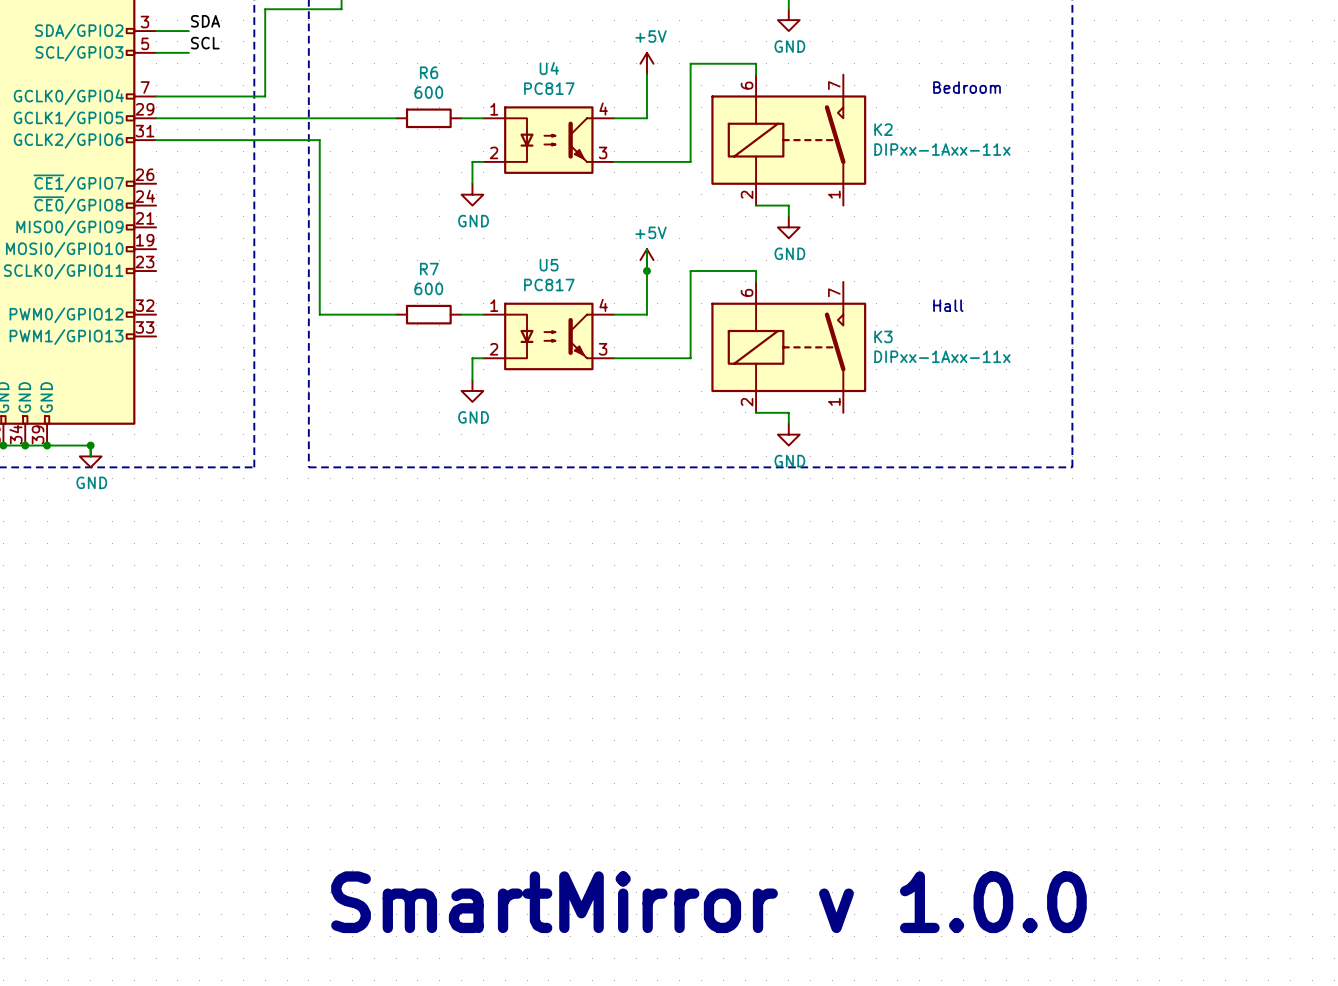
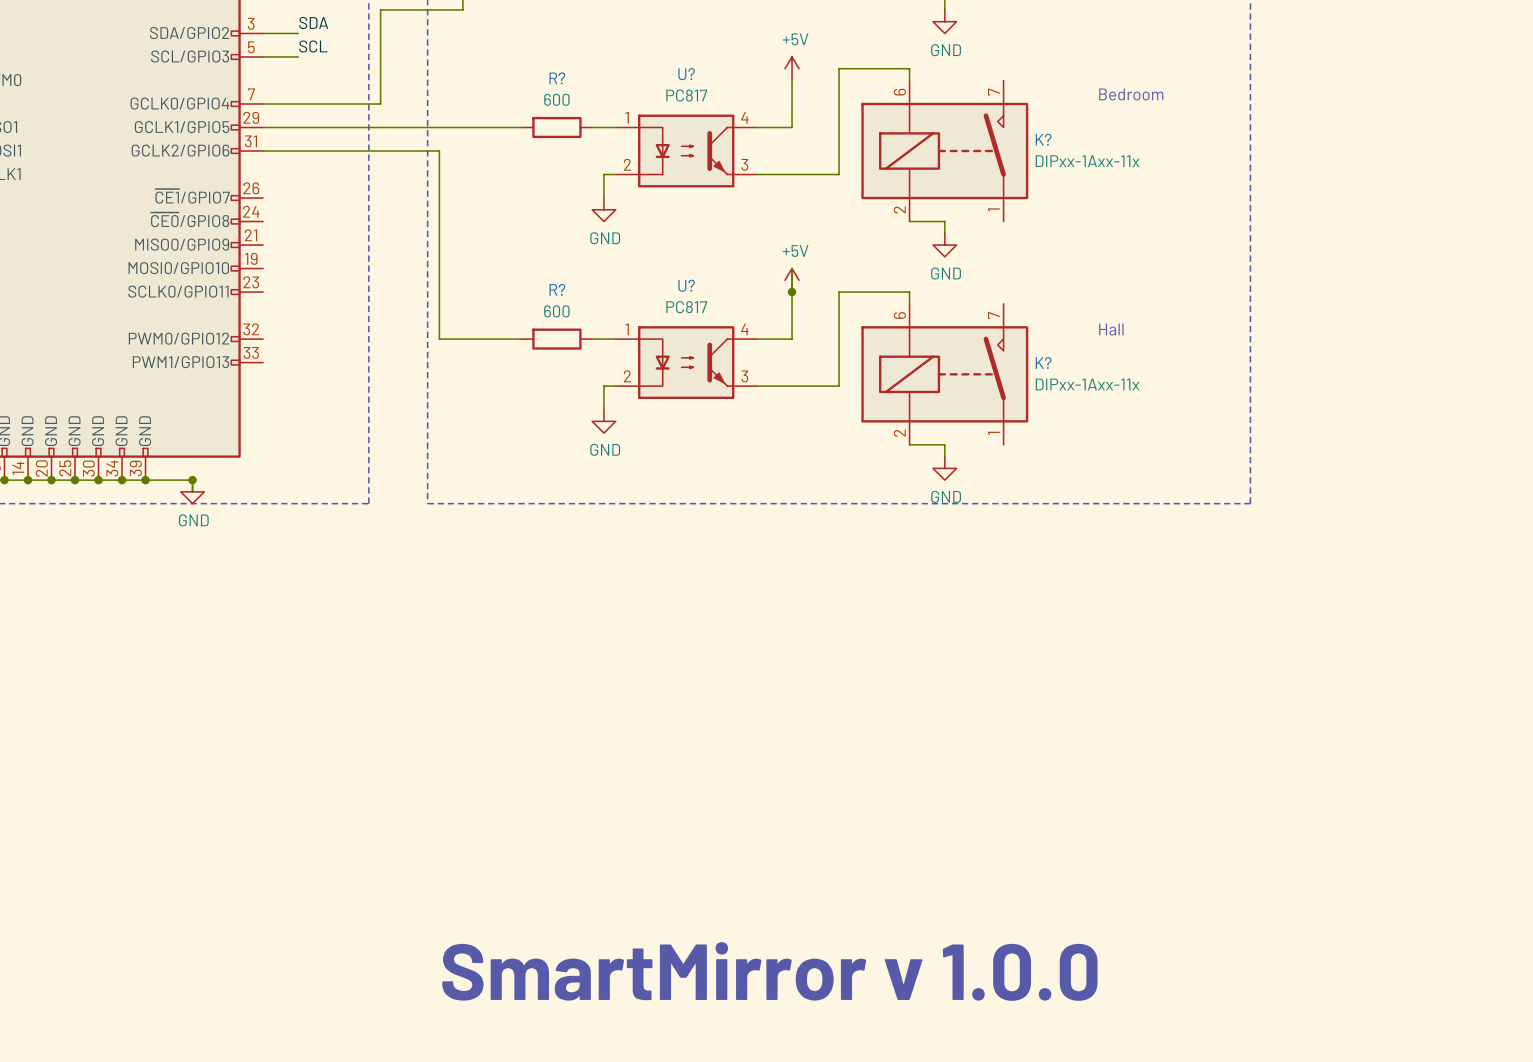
U4 name: U4 (549, 68) -> U? (686, 74)
R6 name: R6 (429, 72) -> R? (557, 78)
K2 name: K2 (883, 129) -> K? (1043, 139)
U5 name: U5 (549, 265) -> U? (686, 285)
R7 name: R7 (429, 269) -> R? (557, 289)
K3 name: K3 (883, 336) -> K? (1043, 363)

